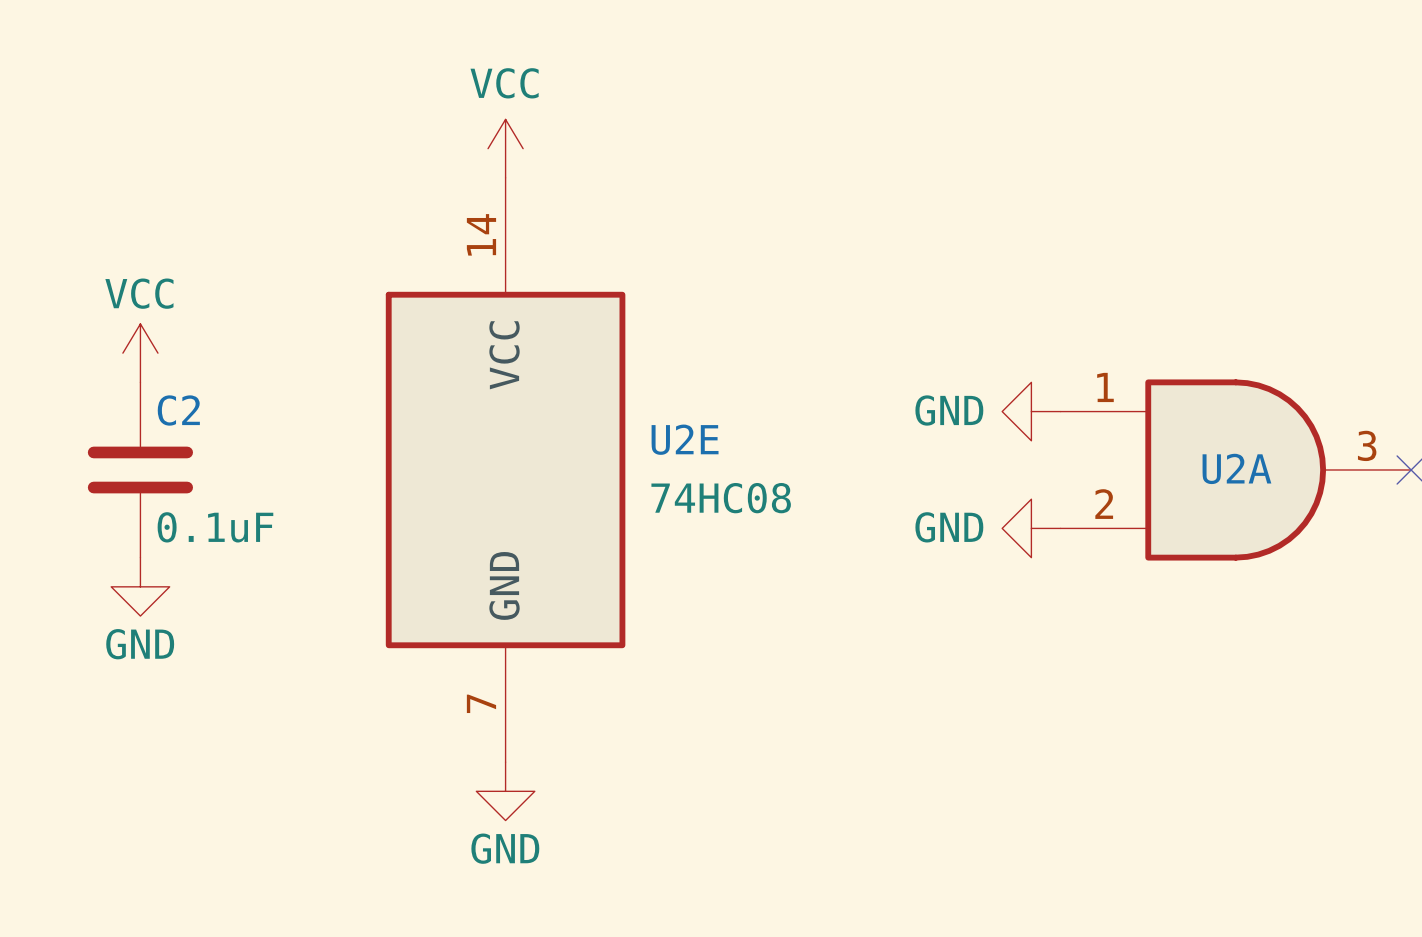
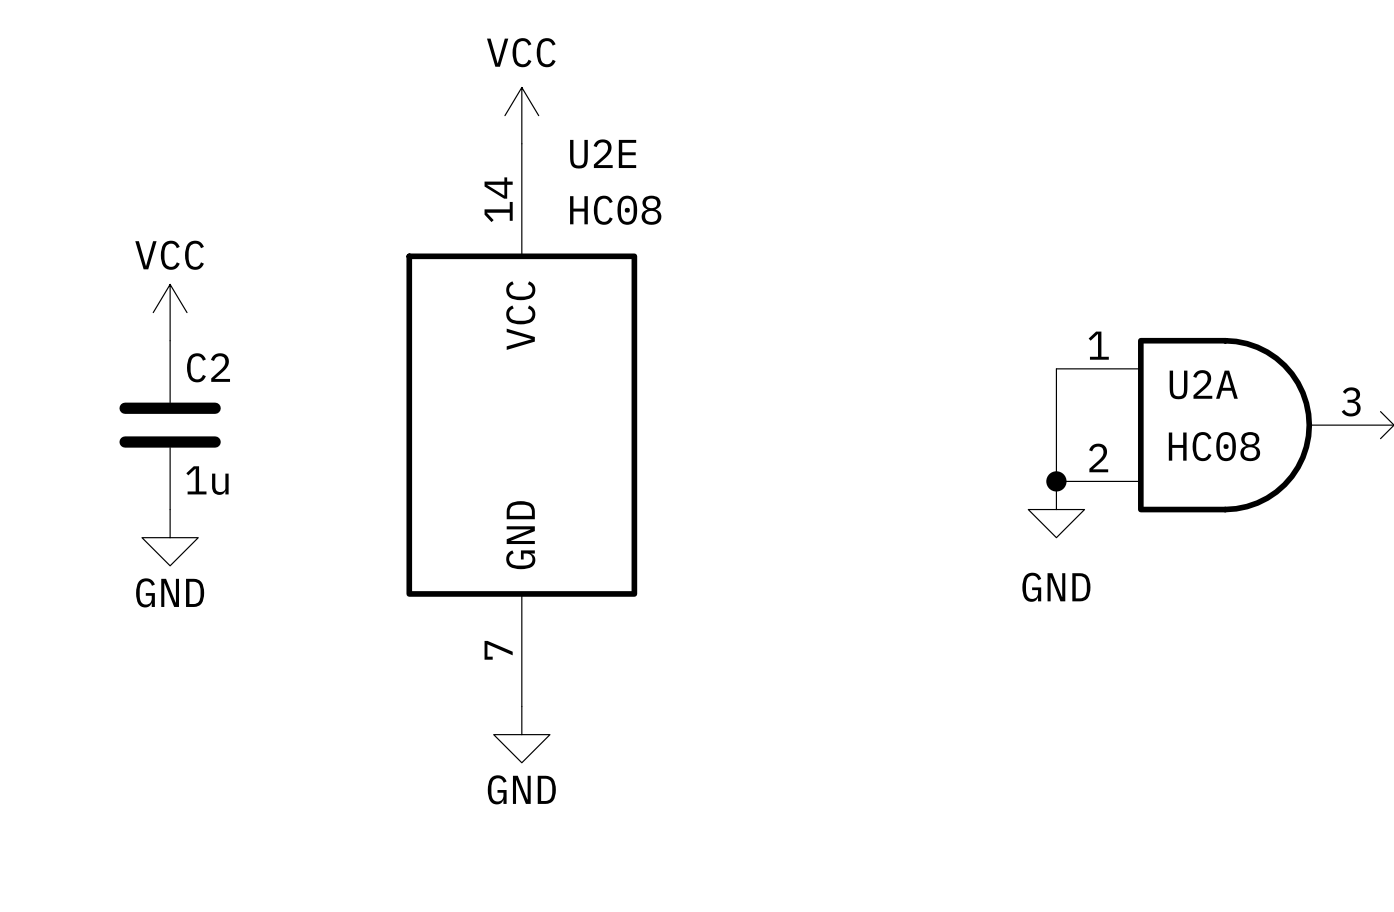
power symbol: GND (1031, 411) -> none
wire: none -> (1056, 368) (1056, 481)
U2E name position: U2E (685, 439) -> U2E (603, 153)
U2A name position: U2A (1236, 468) -> U2A (1203, 384)
U2A value: none -> HC08 (1214, 446)
U2E value: 74HC08 (721, 498) -> HC08 (615, 210)
C2 value: 0.1uF (215, 527) -> 1u (207, 480)
power symbol rotation: 0° (1031, 528) -> 90° counterclockwise (1056, 509)
power symbol position: GND (1031, 528) -> GND (1056, 509)
junction: none -> (1056, 481)

